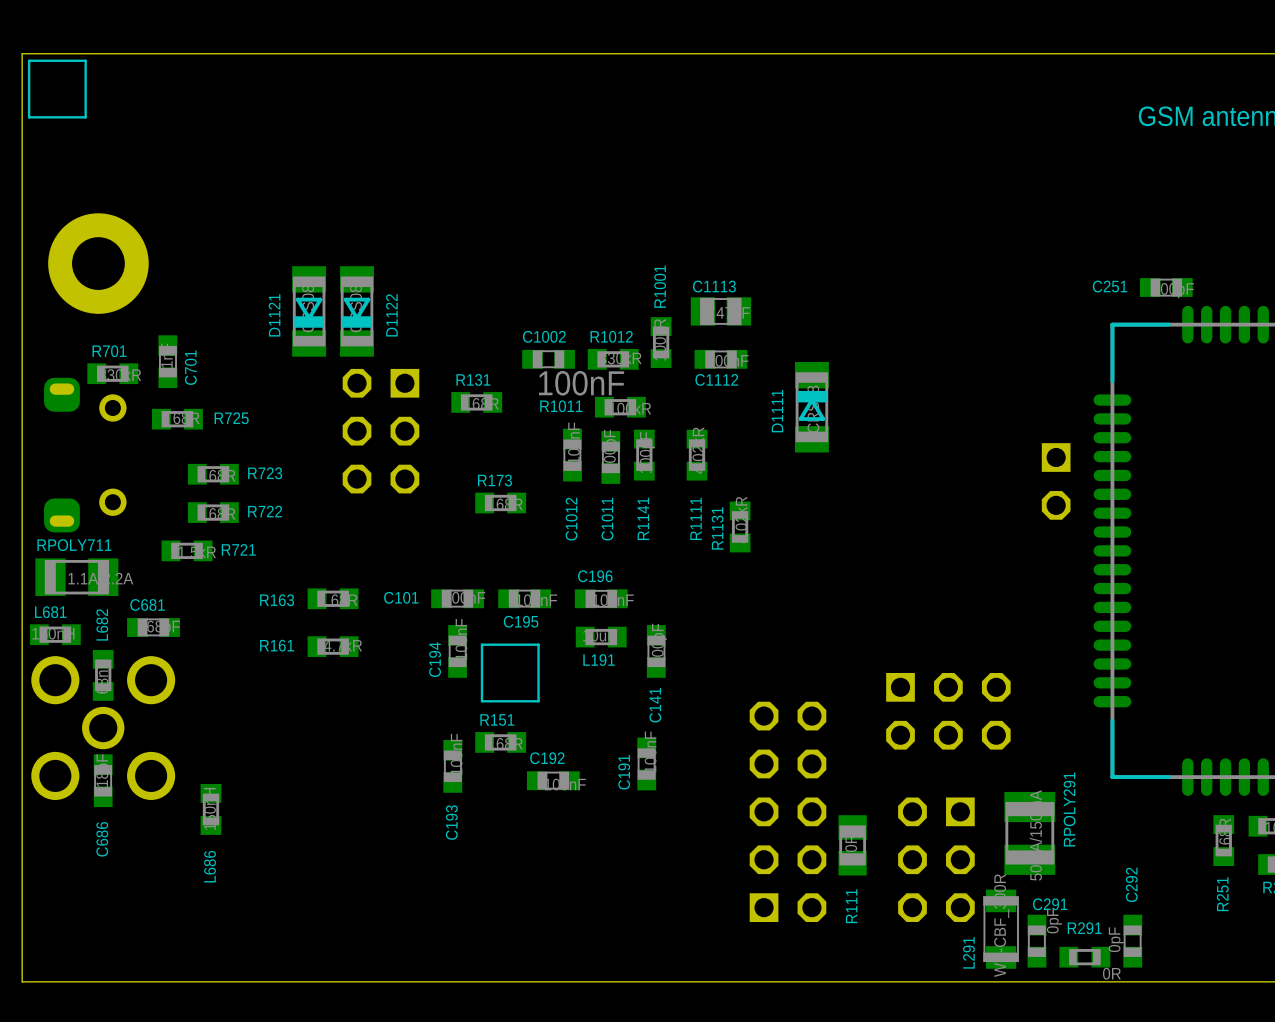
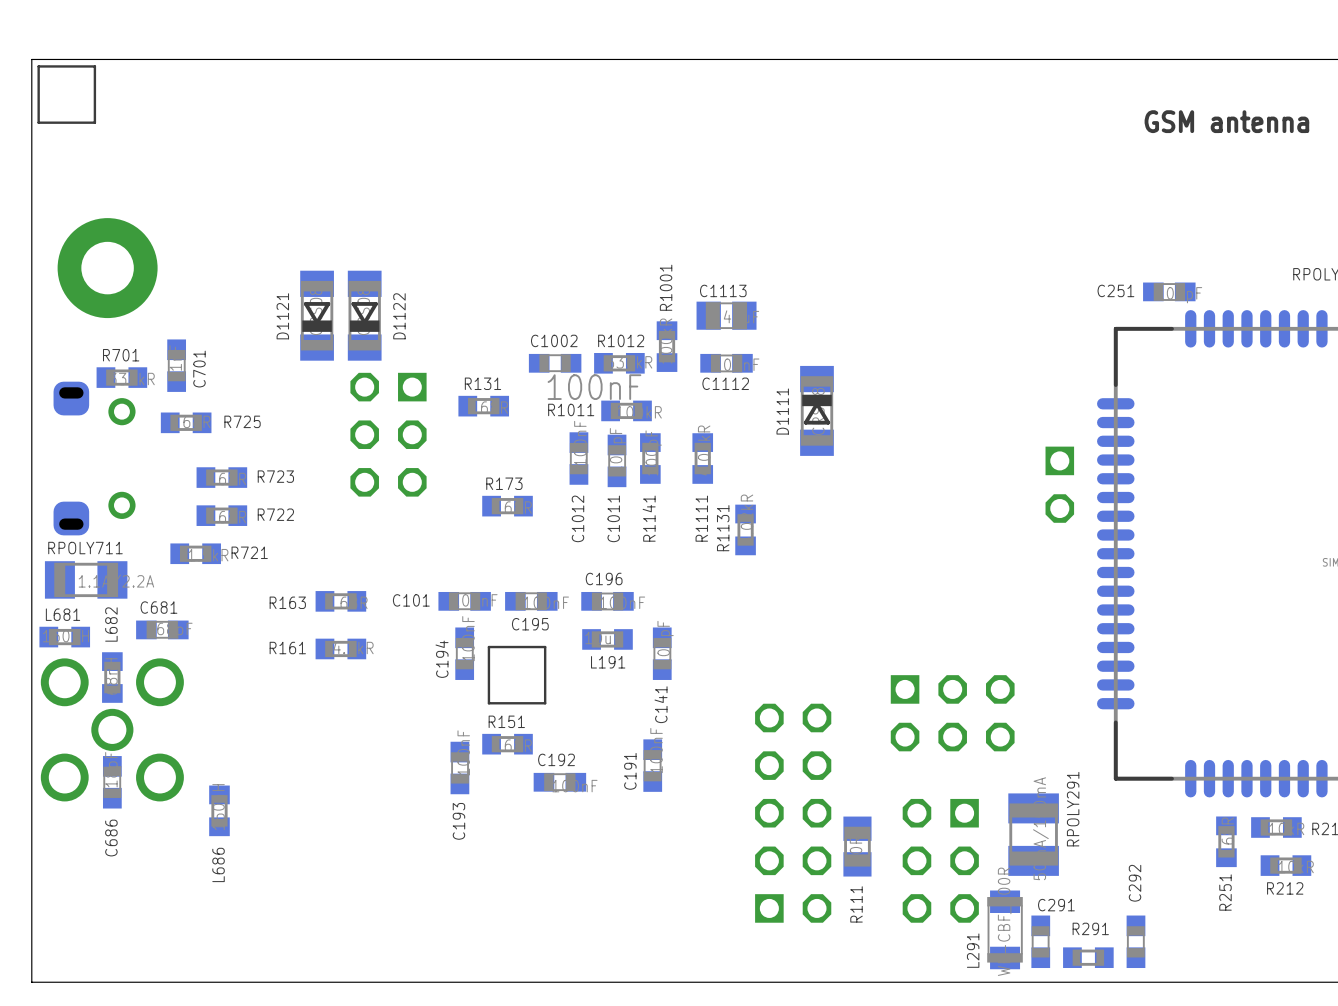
C291 value: 0pF (1054, 921) -> none
C292 value: 0pF (1116, 939) -> none
R291 value: 0R (1111, 973) -> none

